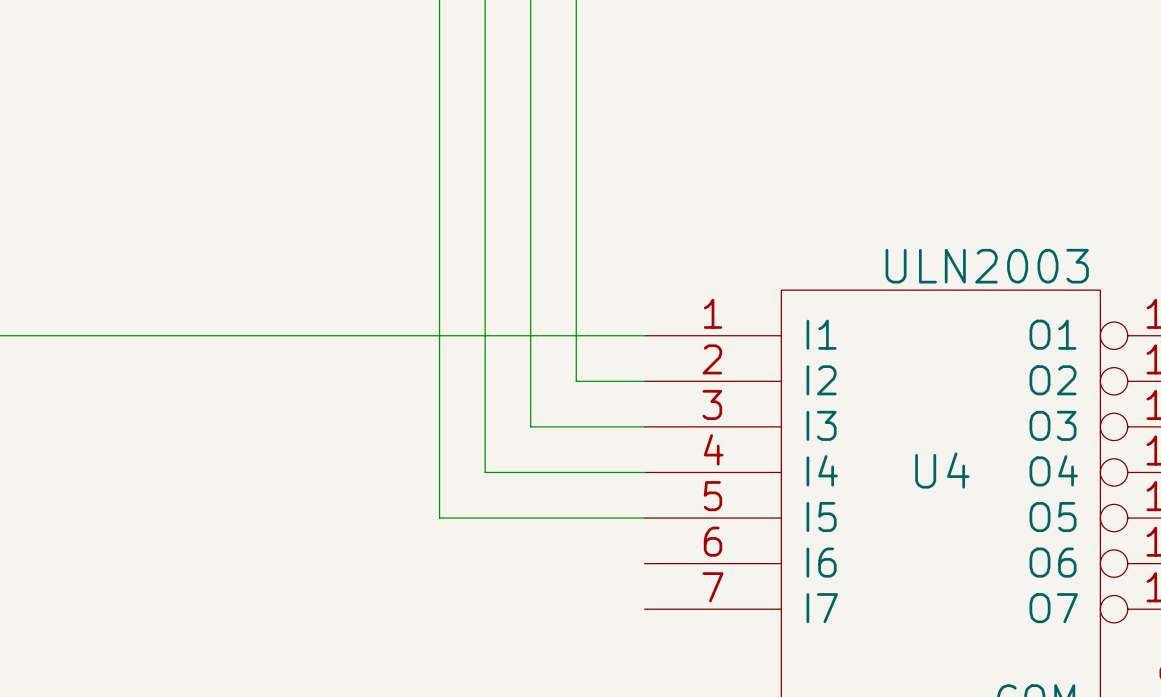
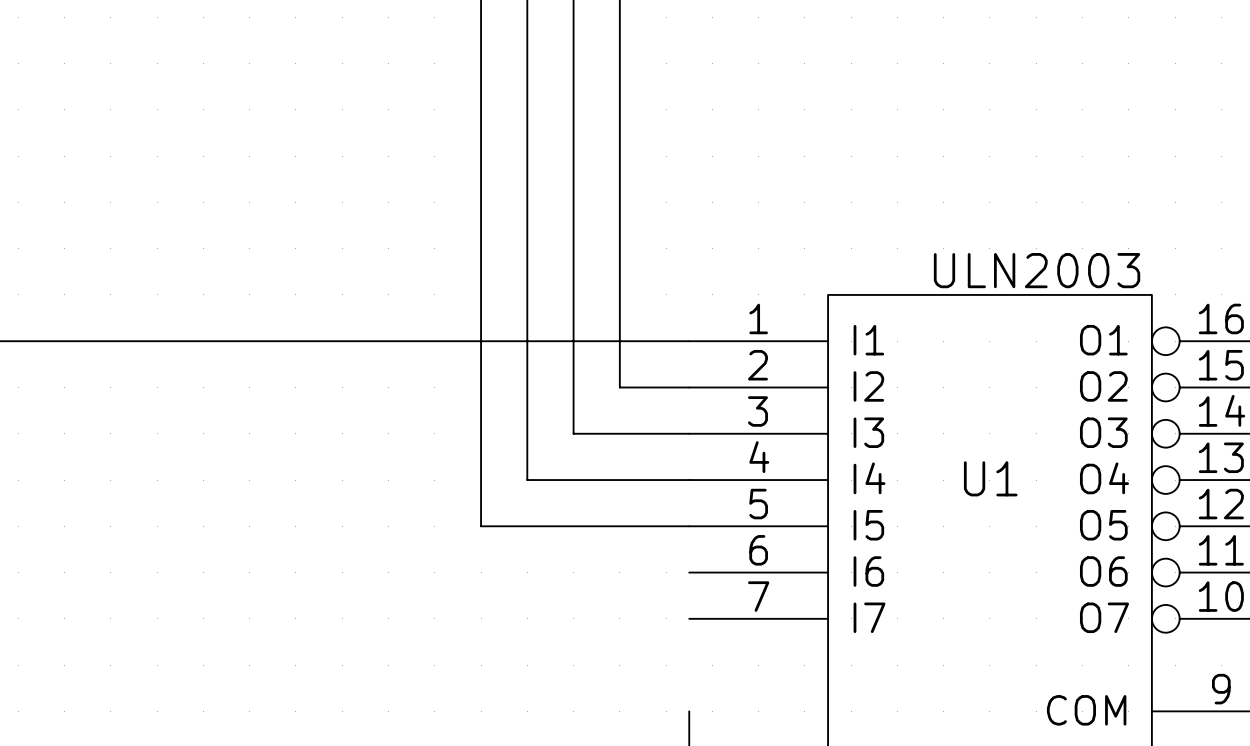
U4 name: U4 (942, 470) -> U1 (990, 478)

